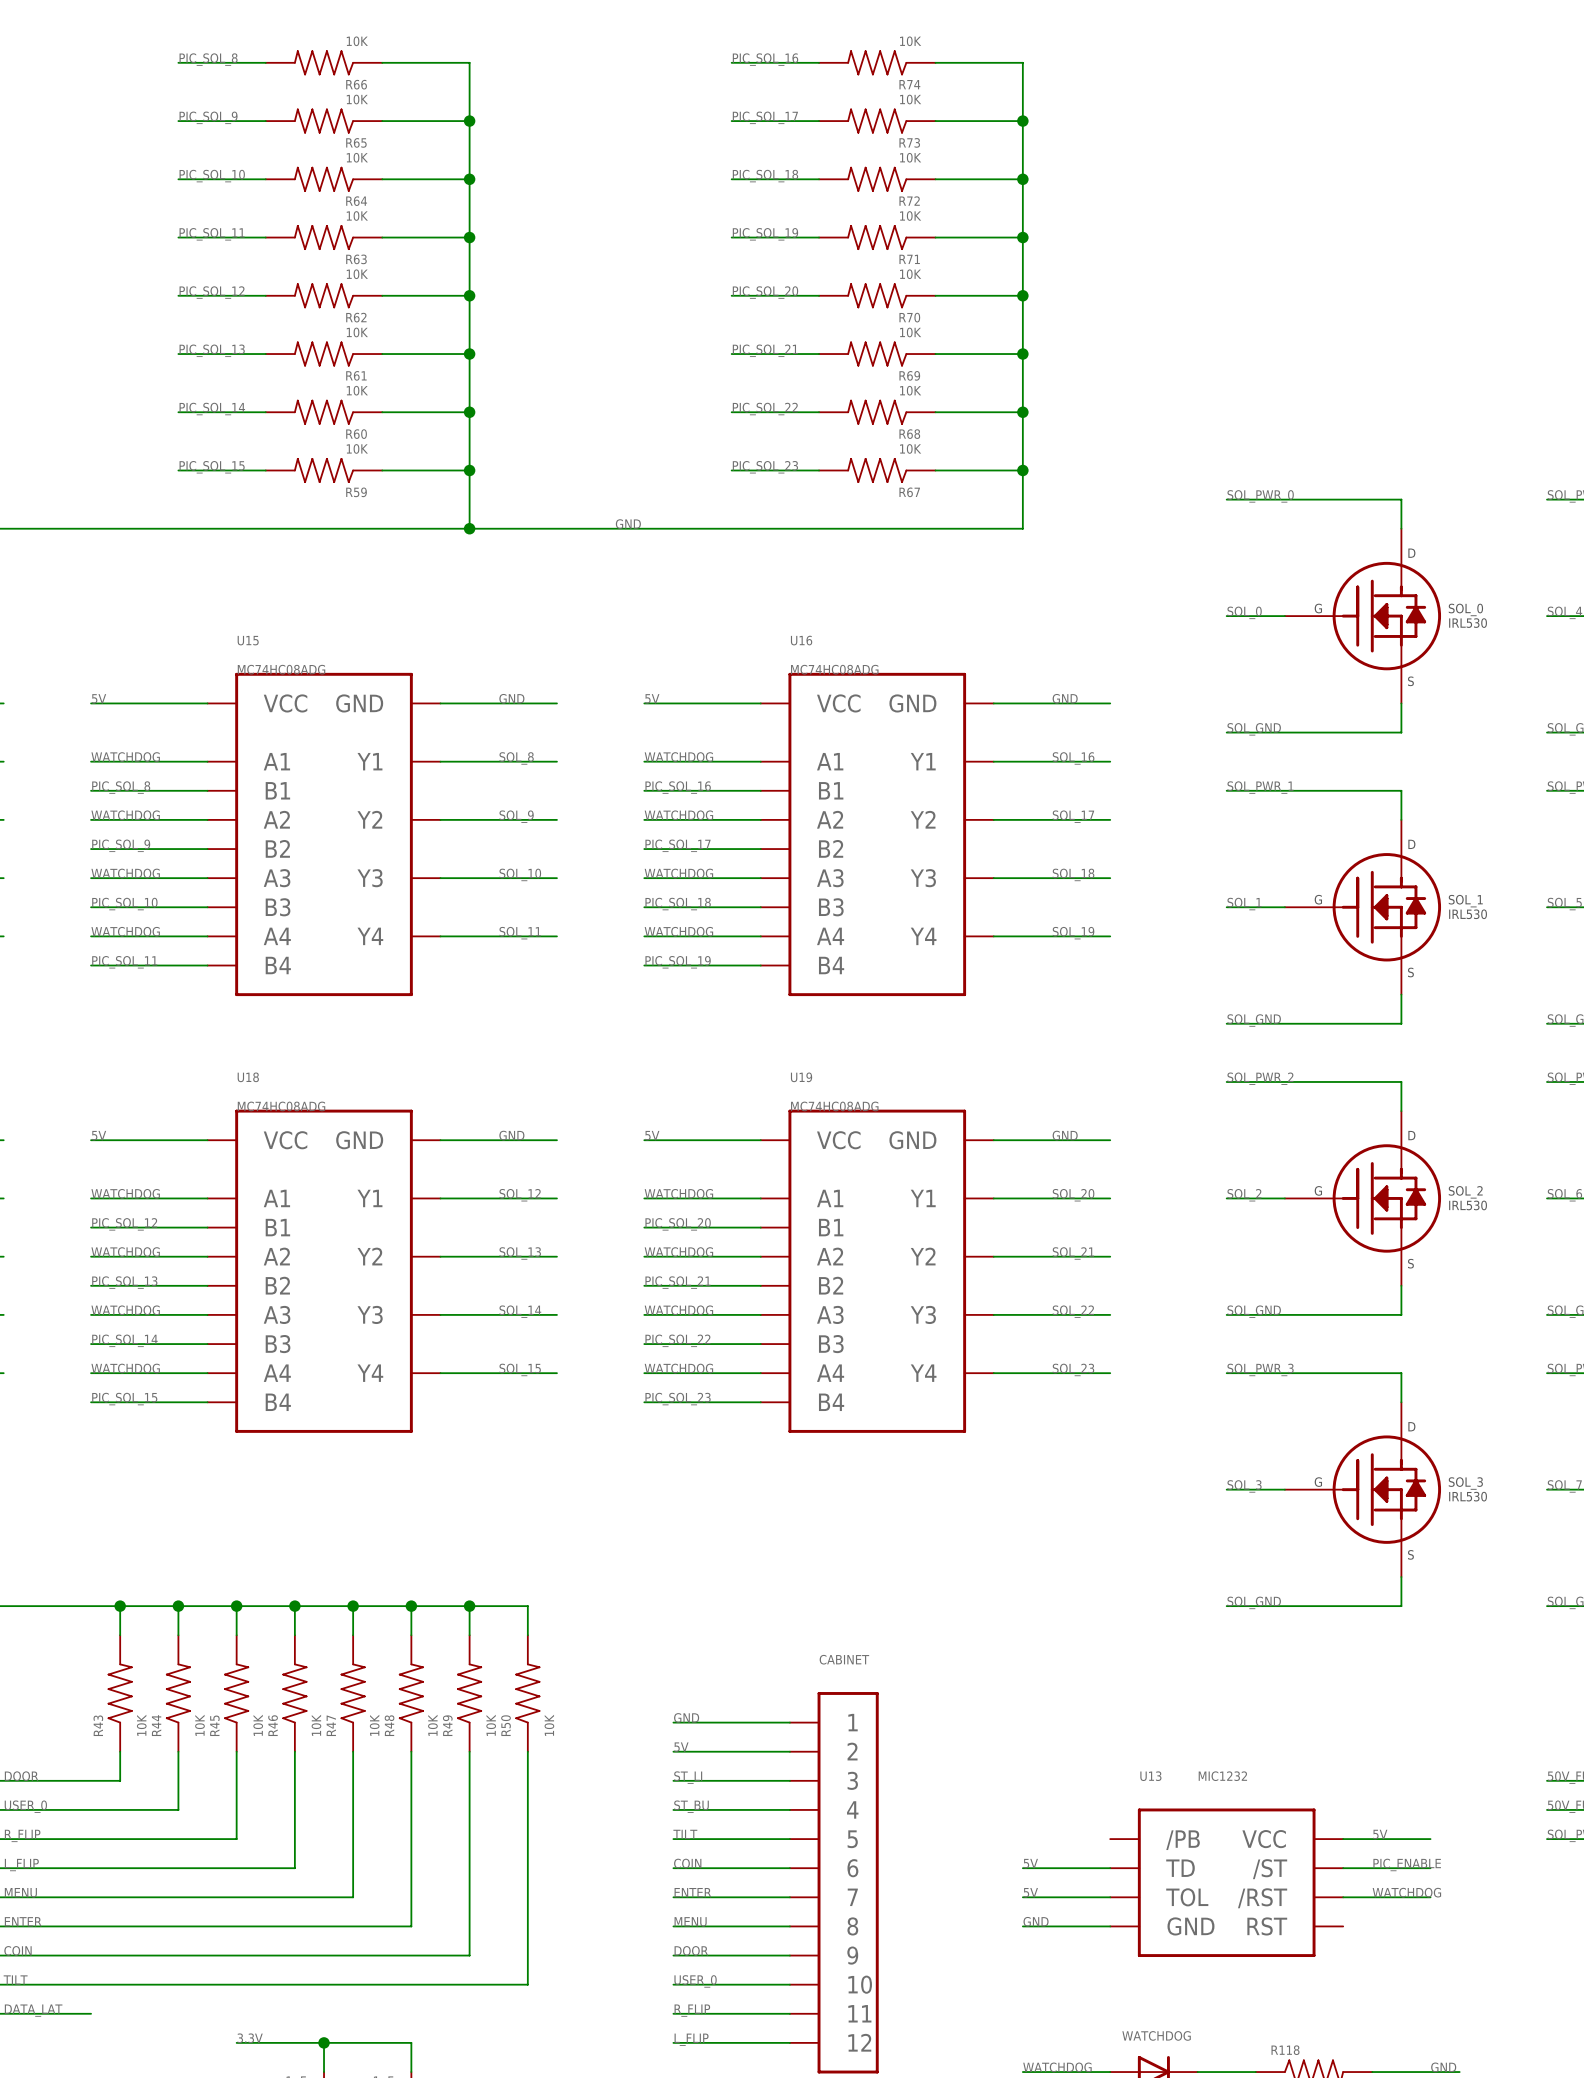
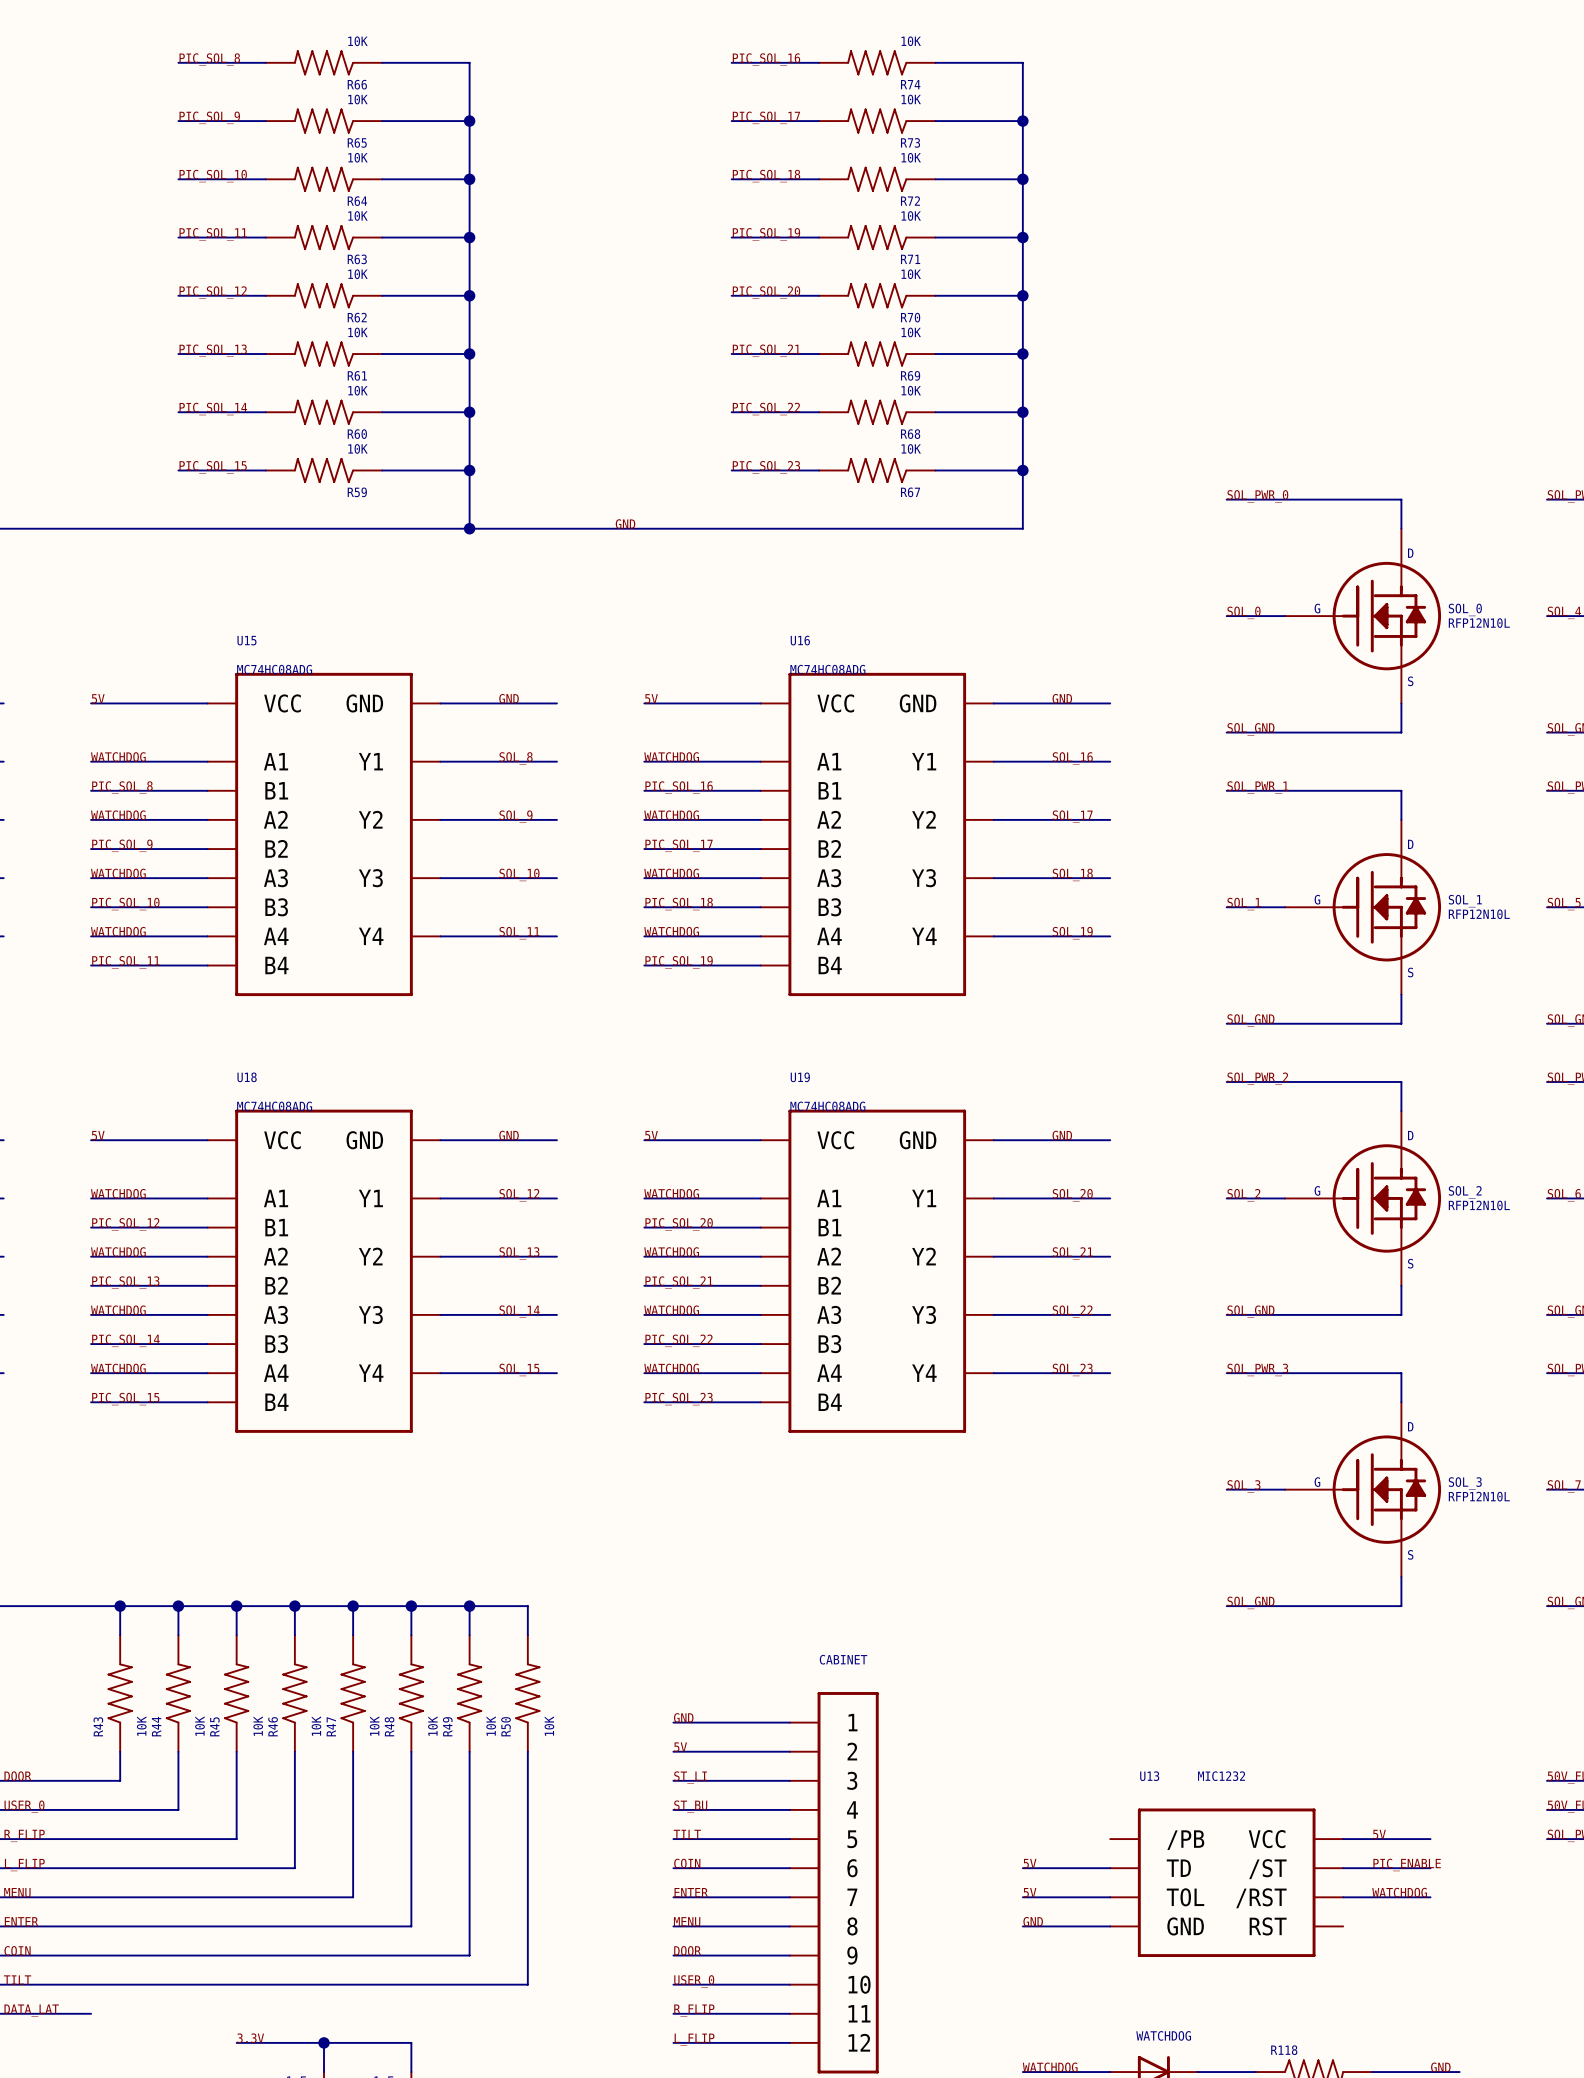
SOL_0 value: IRL530 (1468, 623) -> RFP12N10L (1479, 623)
SOL_1 value: IRL530 (1468, 914) -> RFP12N10L (1479, 914)
SOL_2 value: IRL530 (1468, 1205) -> RFP12N10L (1479, 1205)
SOL_3 value: IRL530 (1468, 1496) -> RFP12N10L (1479, 1496)

